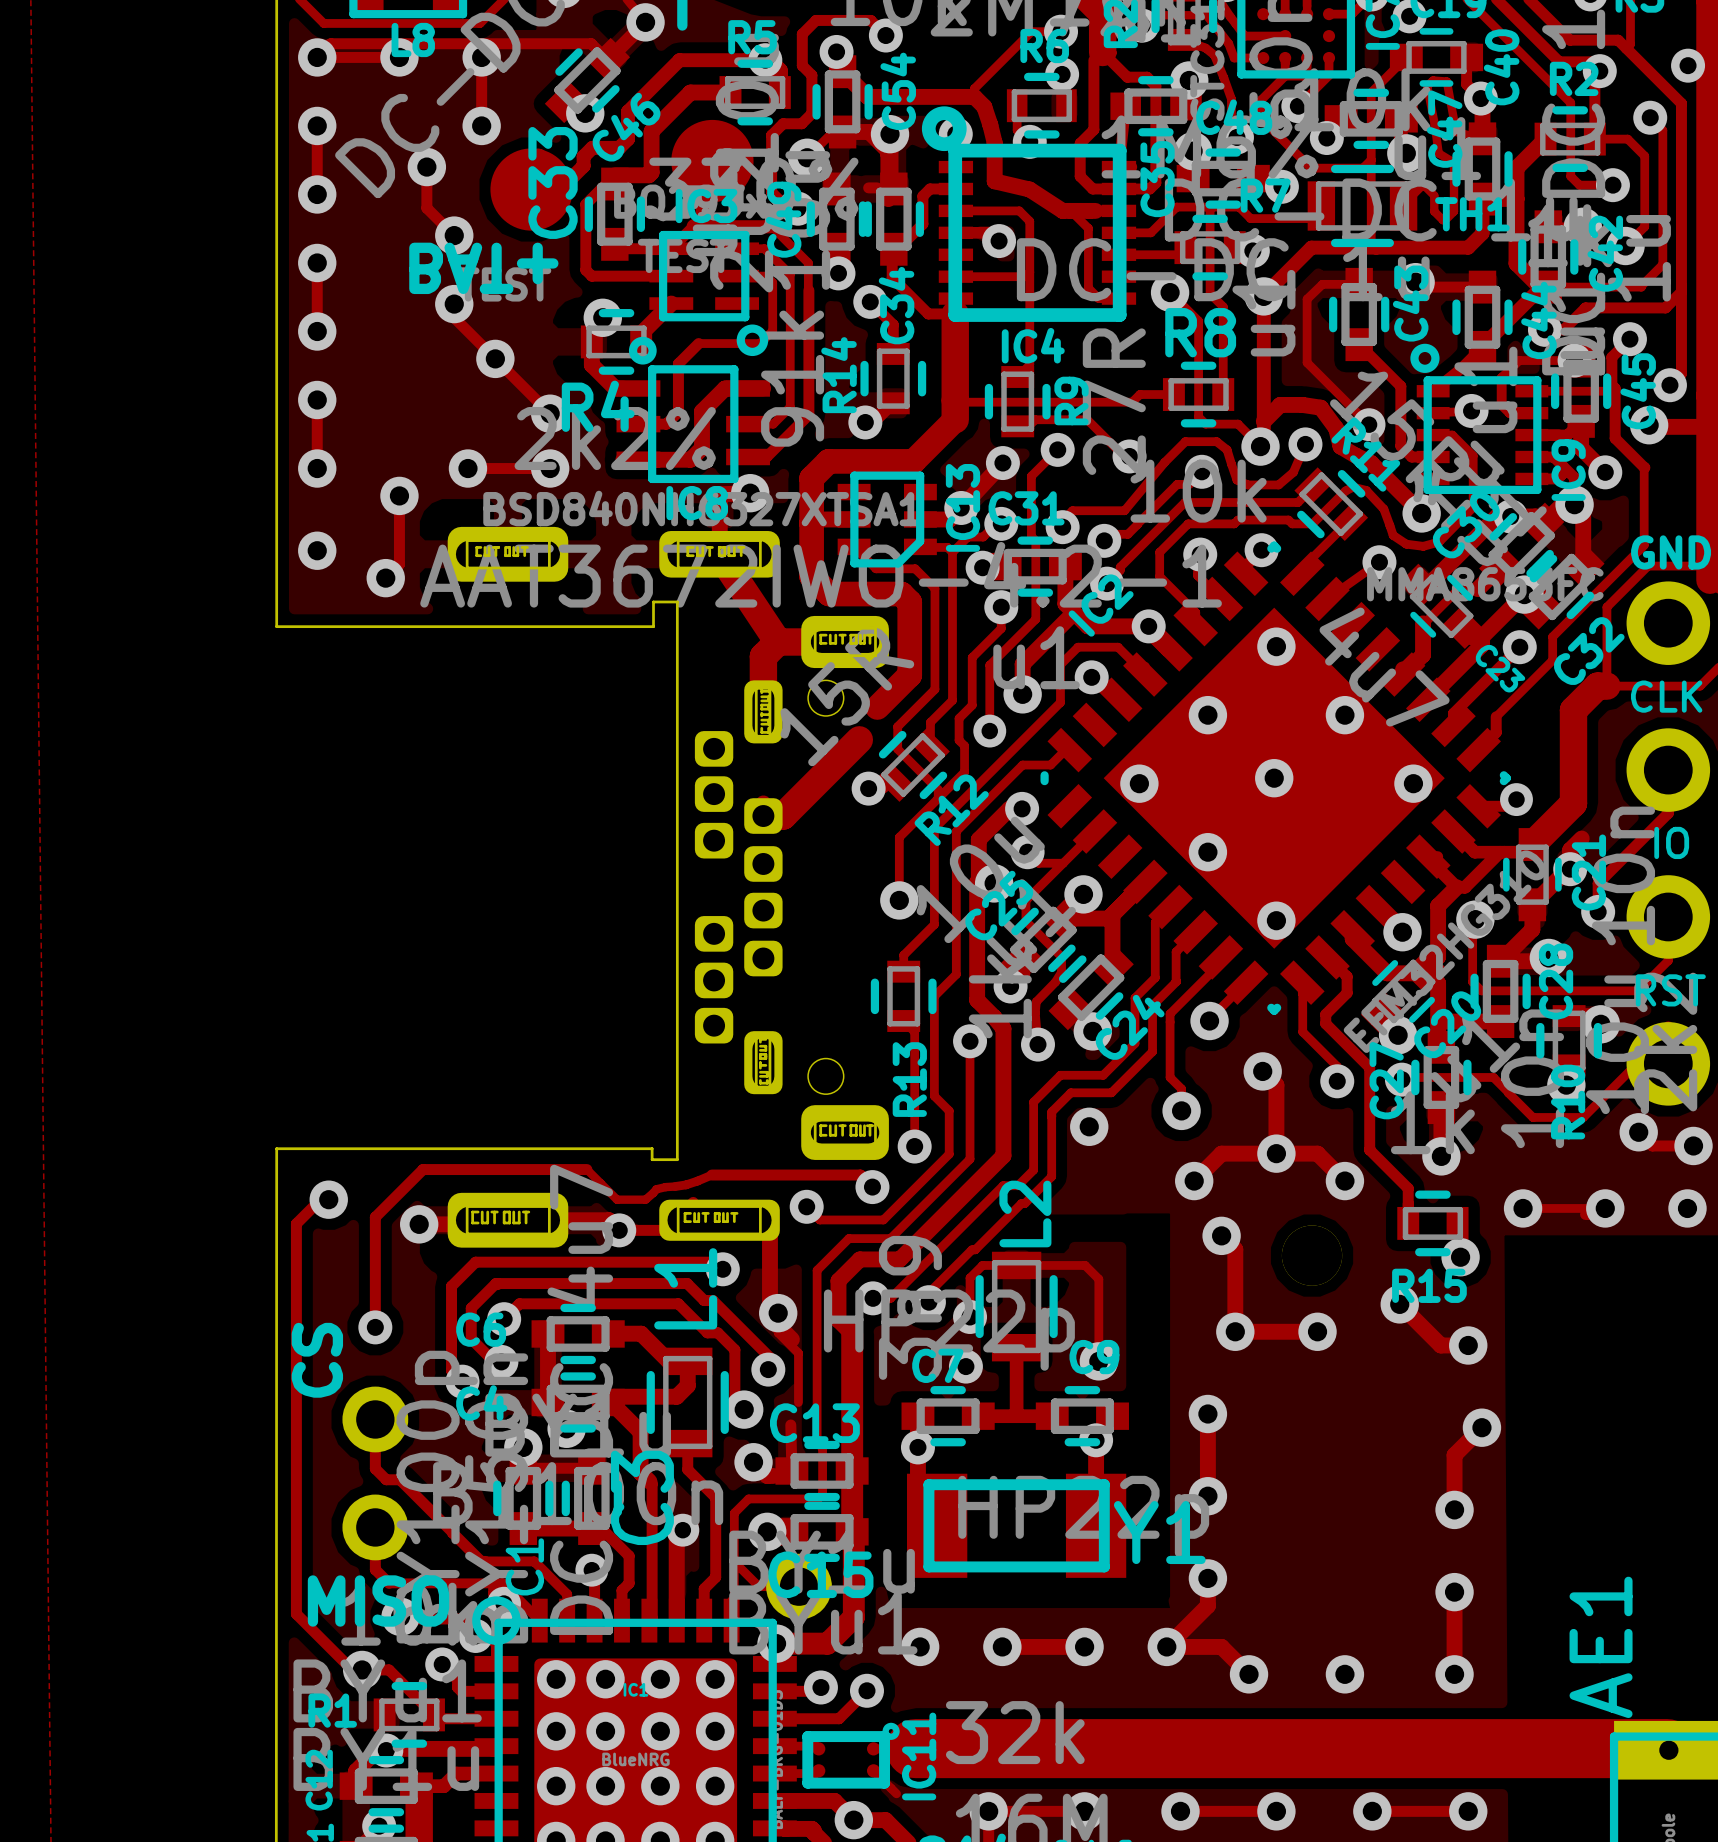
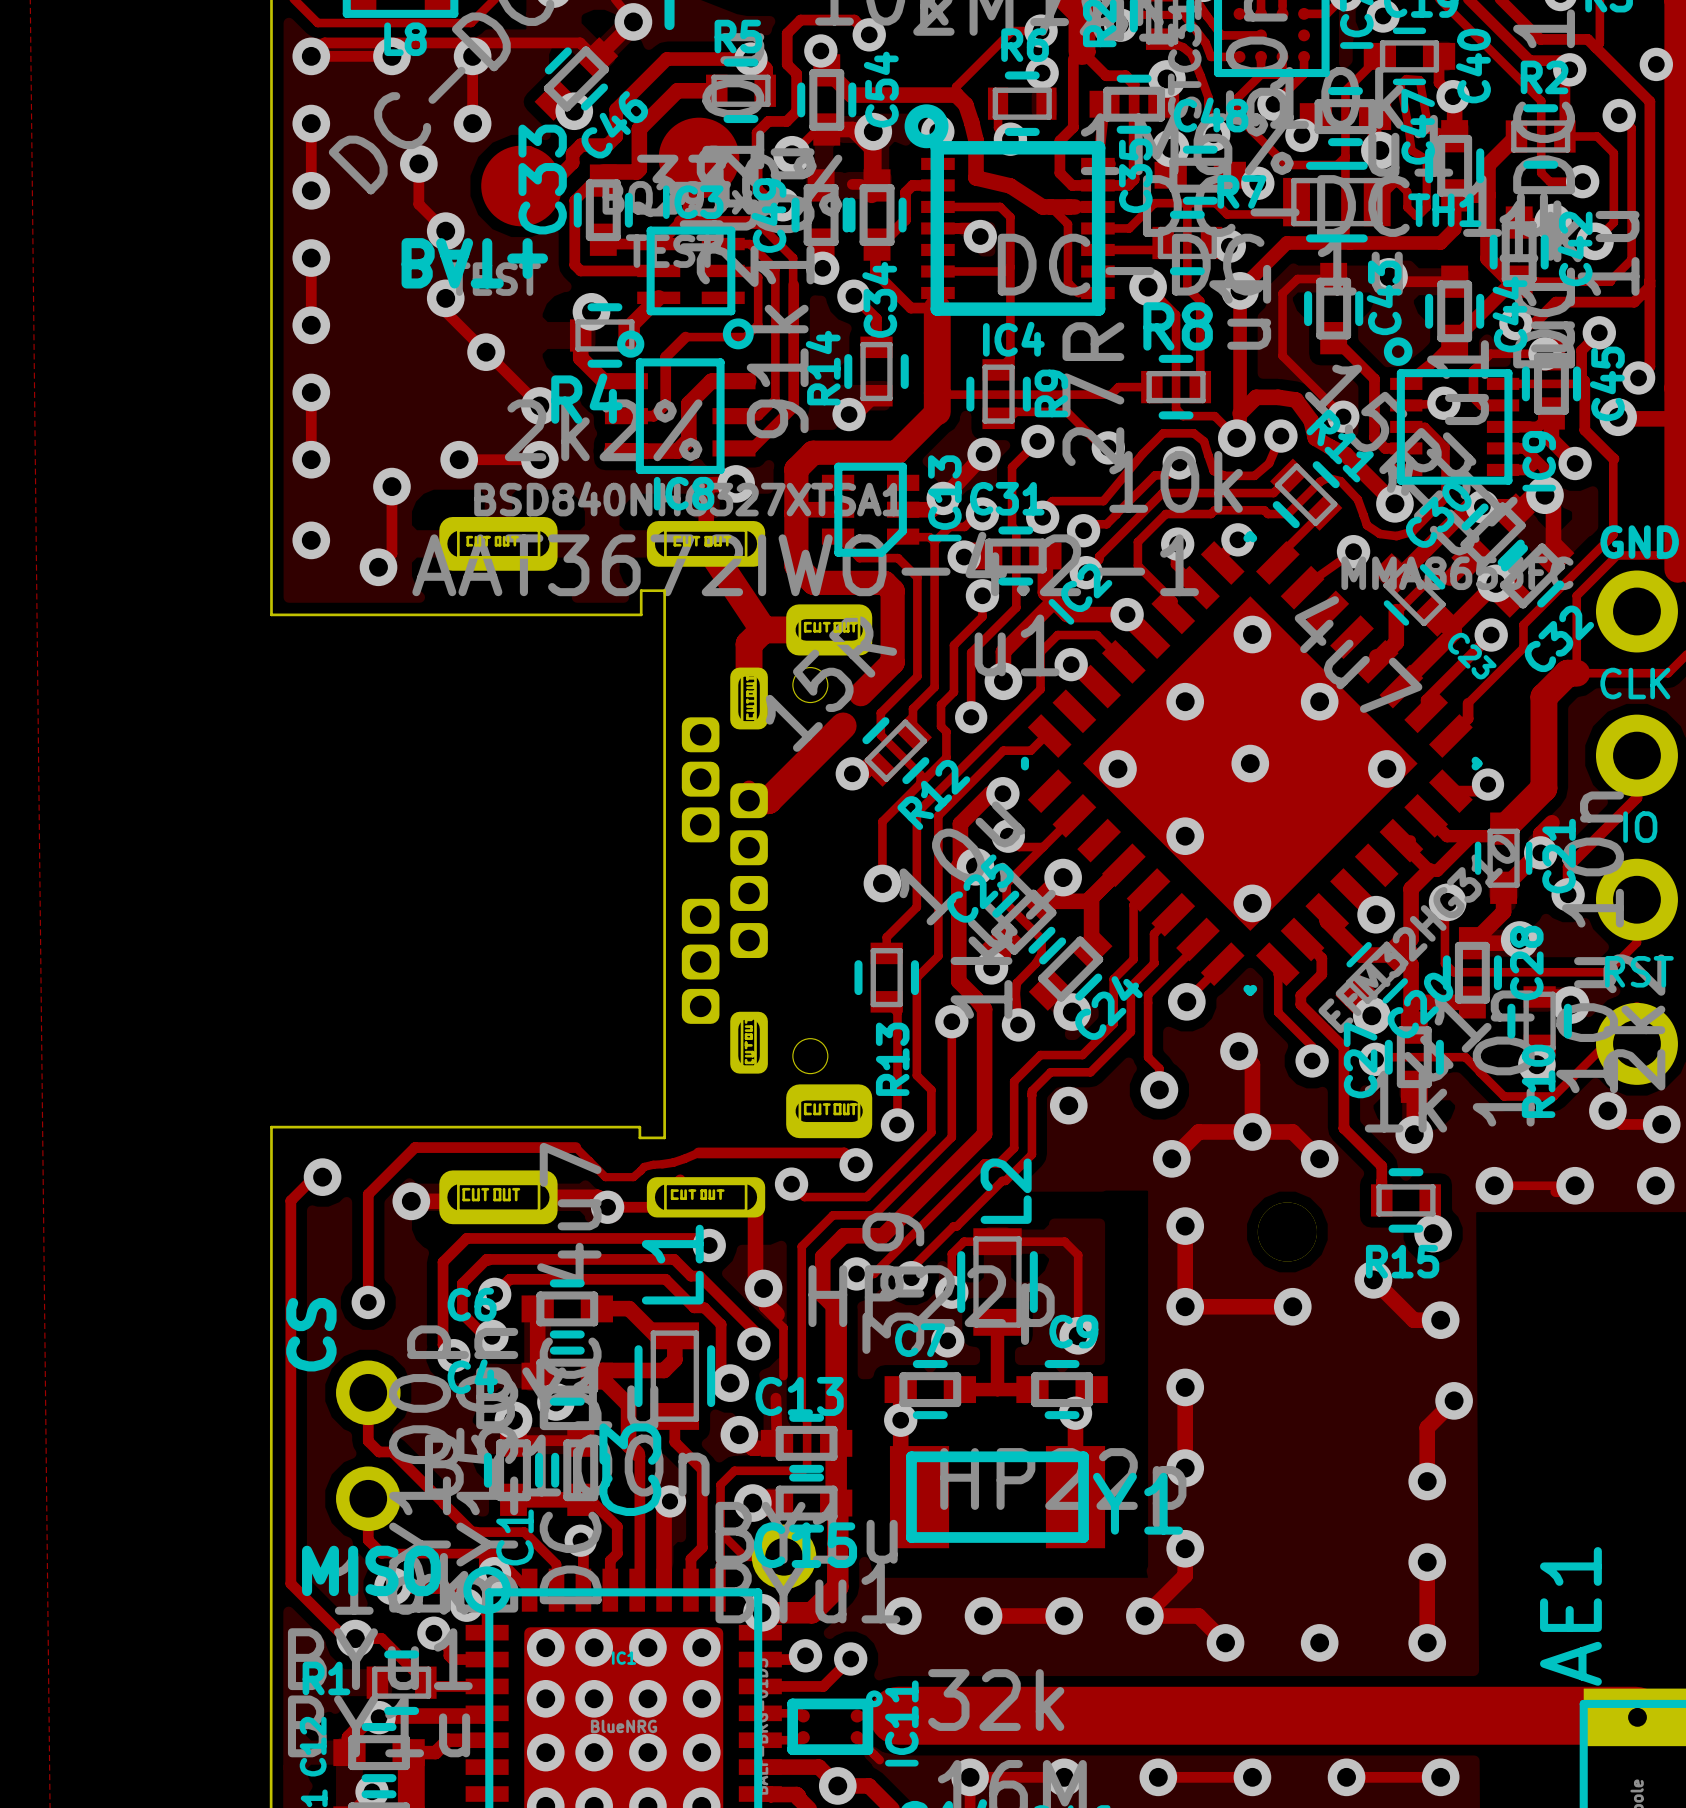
track: (1221, 1235) (1235, 1249) (1235, 1331) -> (1185, 1226) (1185, 1306) (1212, 1306)
via position: (1221, 1235) -> (1185, 1226)
via position: (1235, 1331) -> (1185, 1306)

